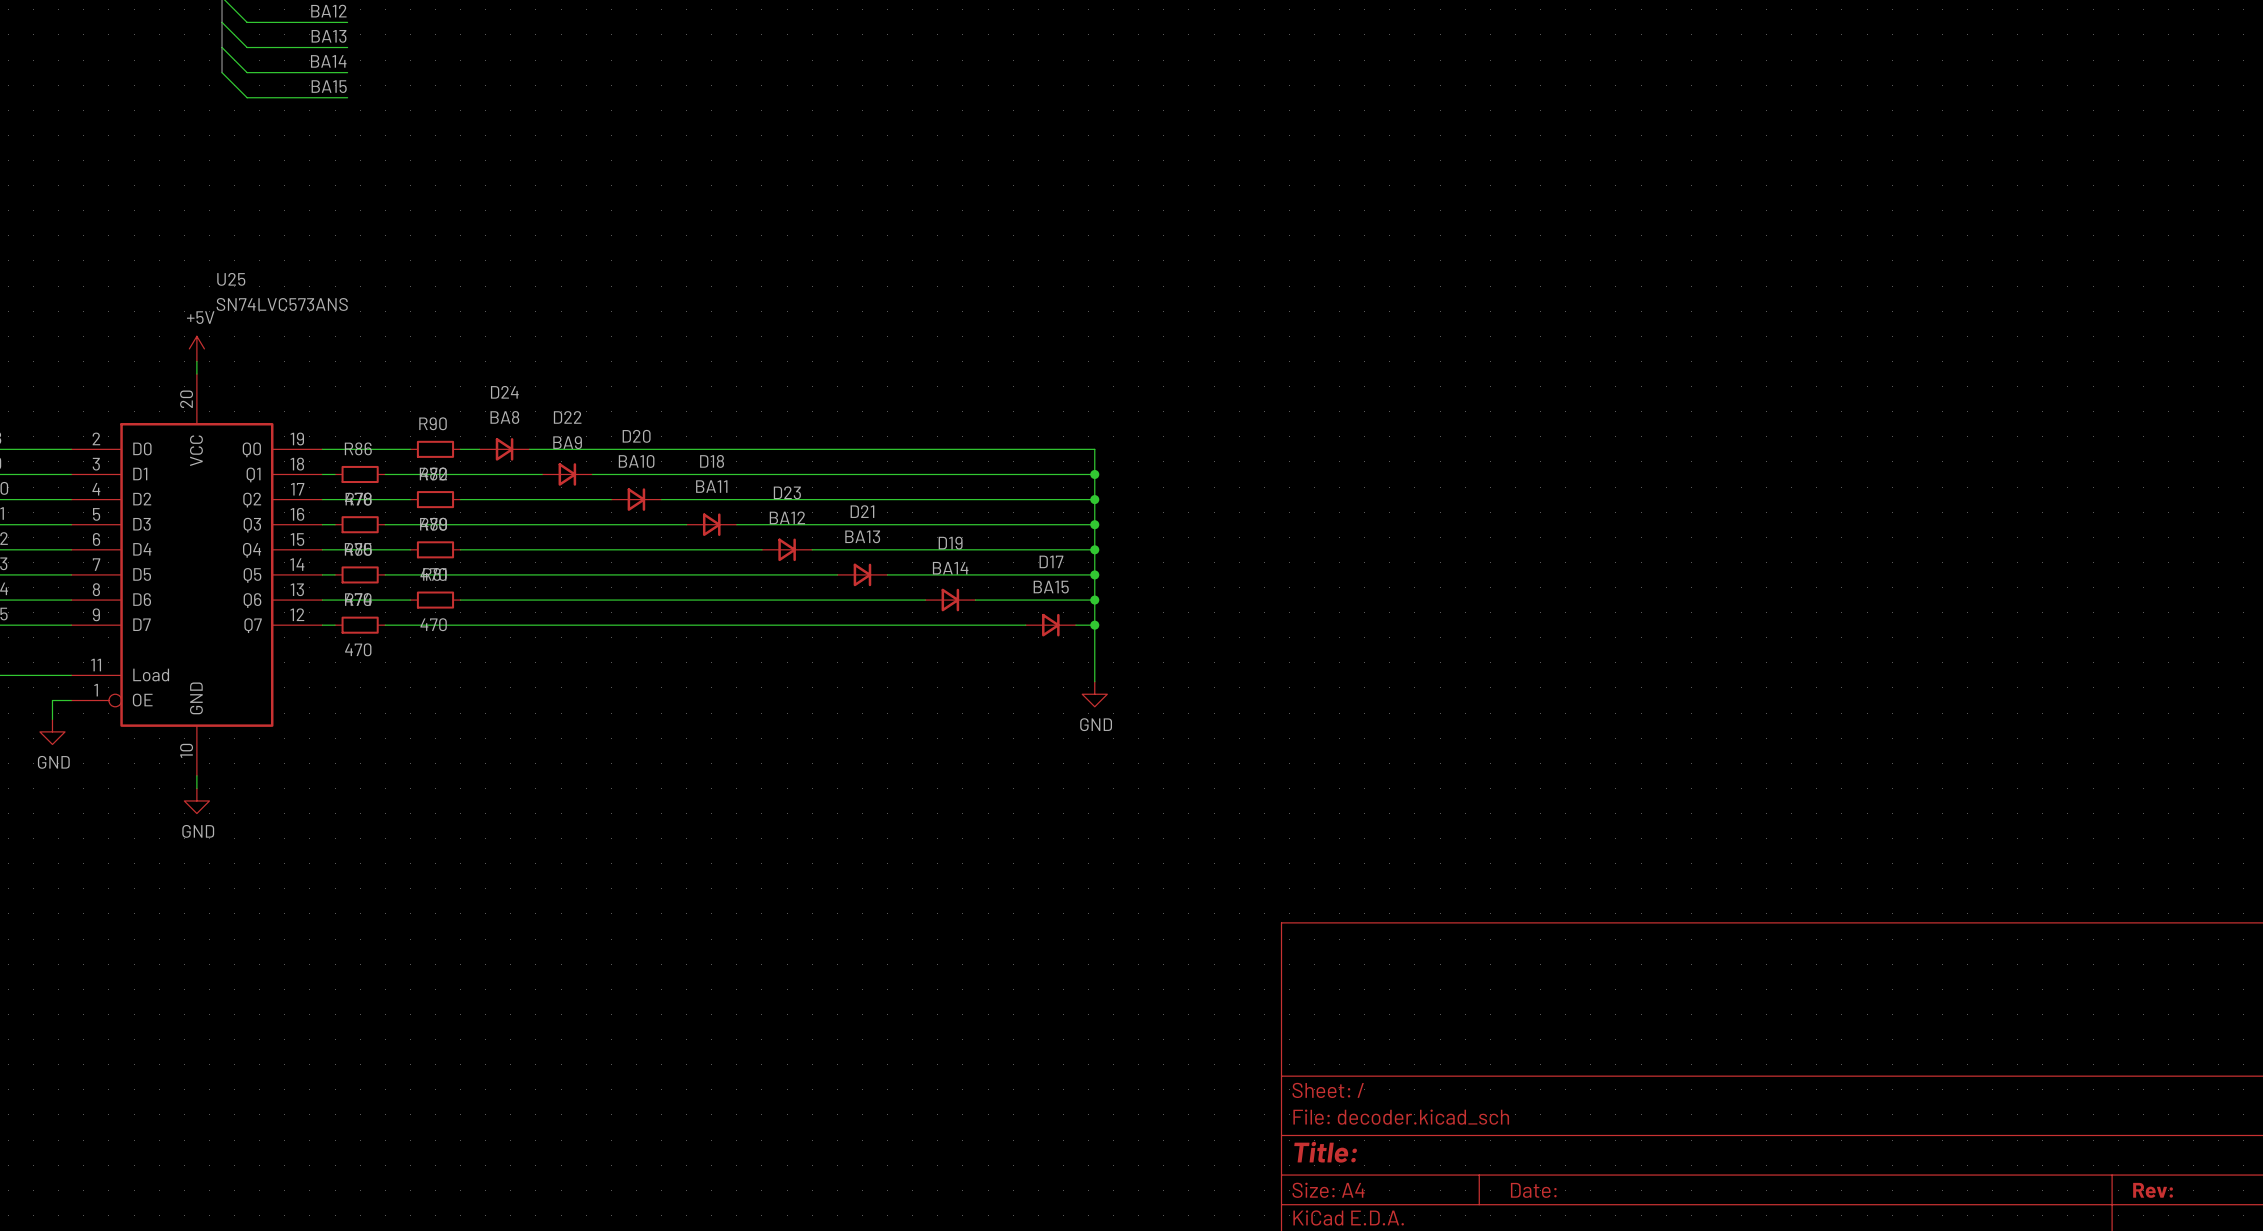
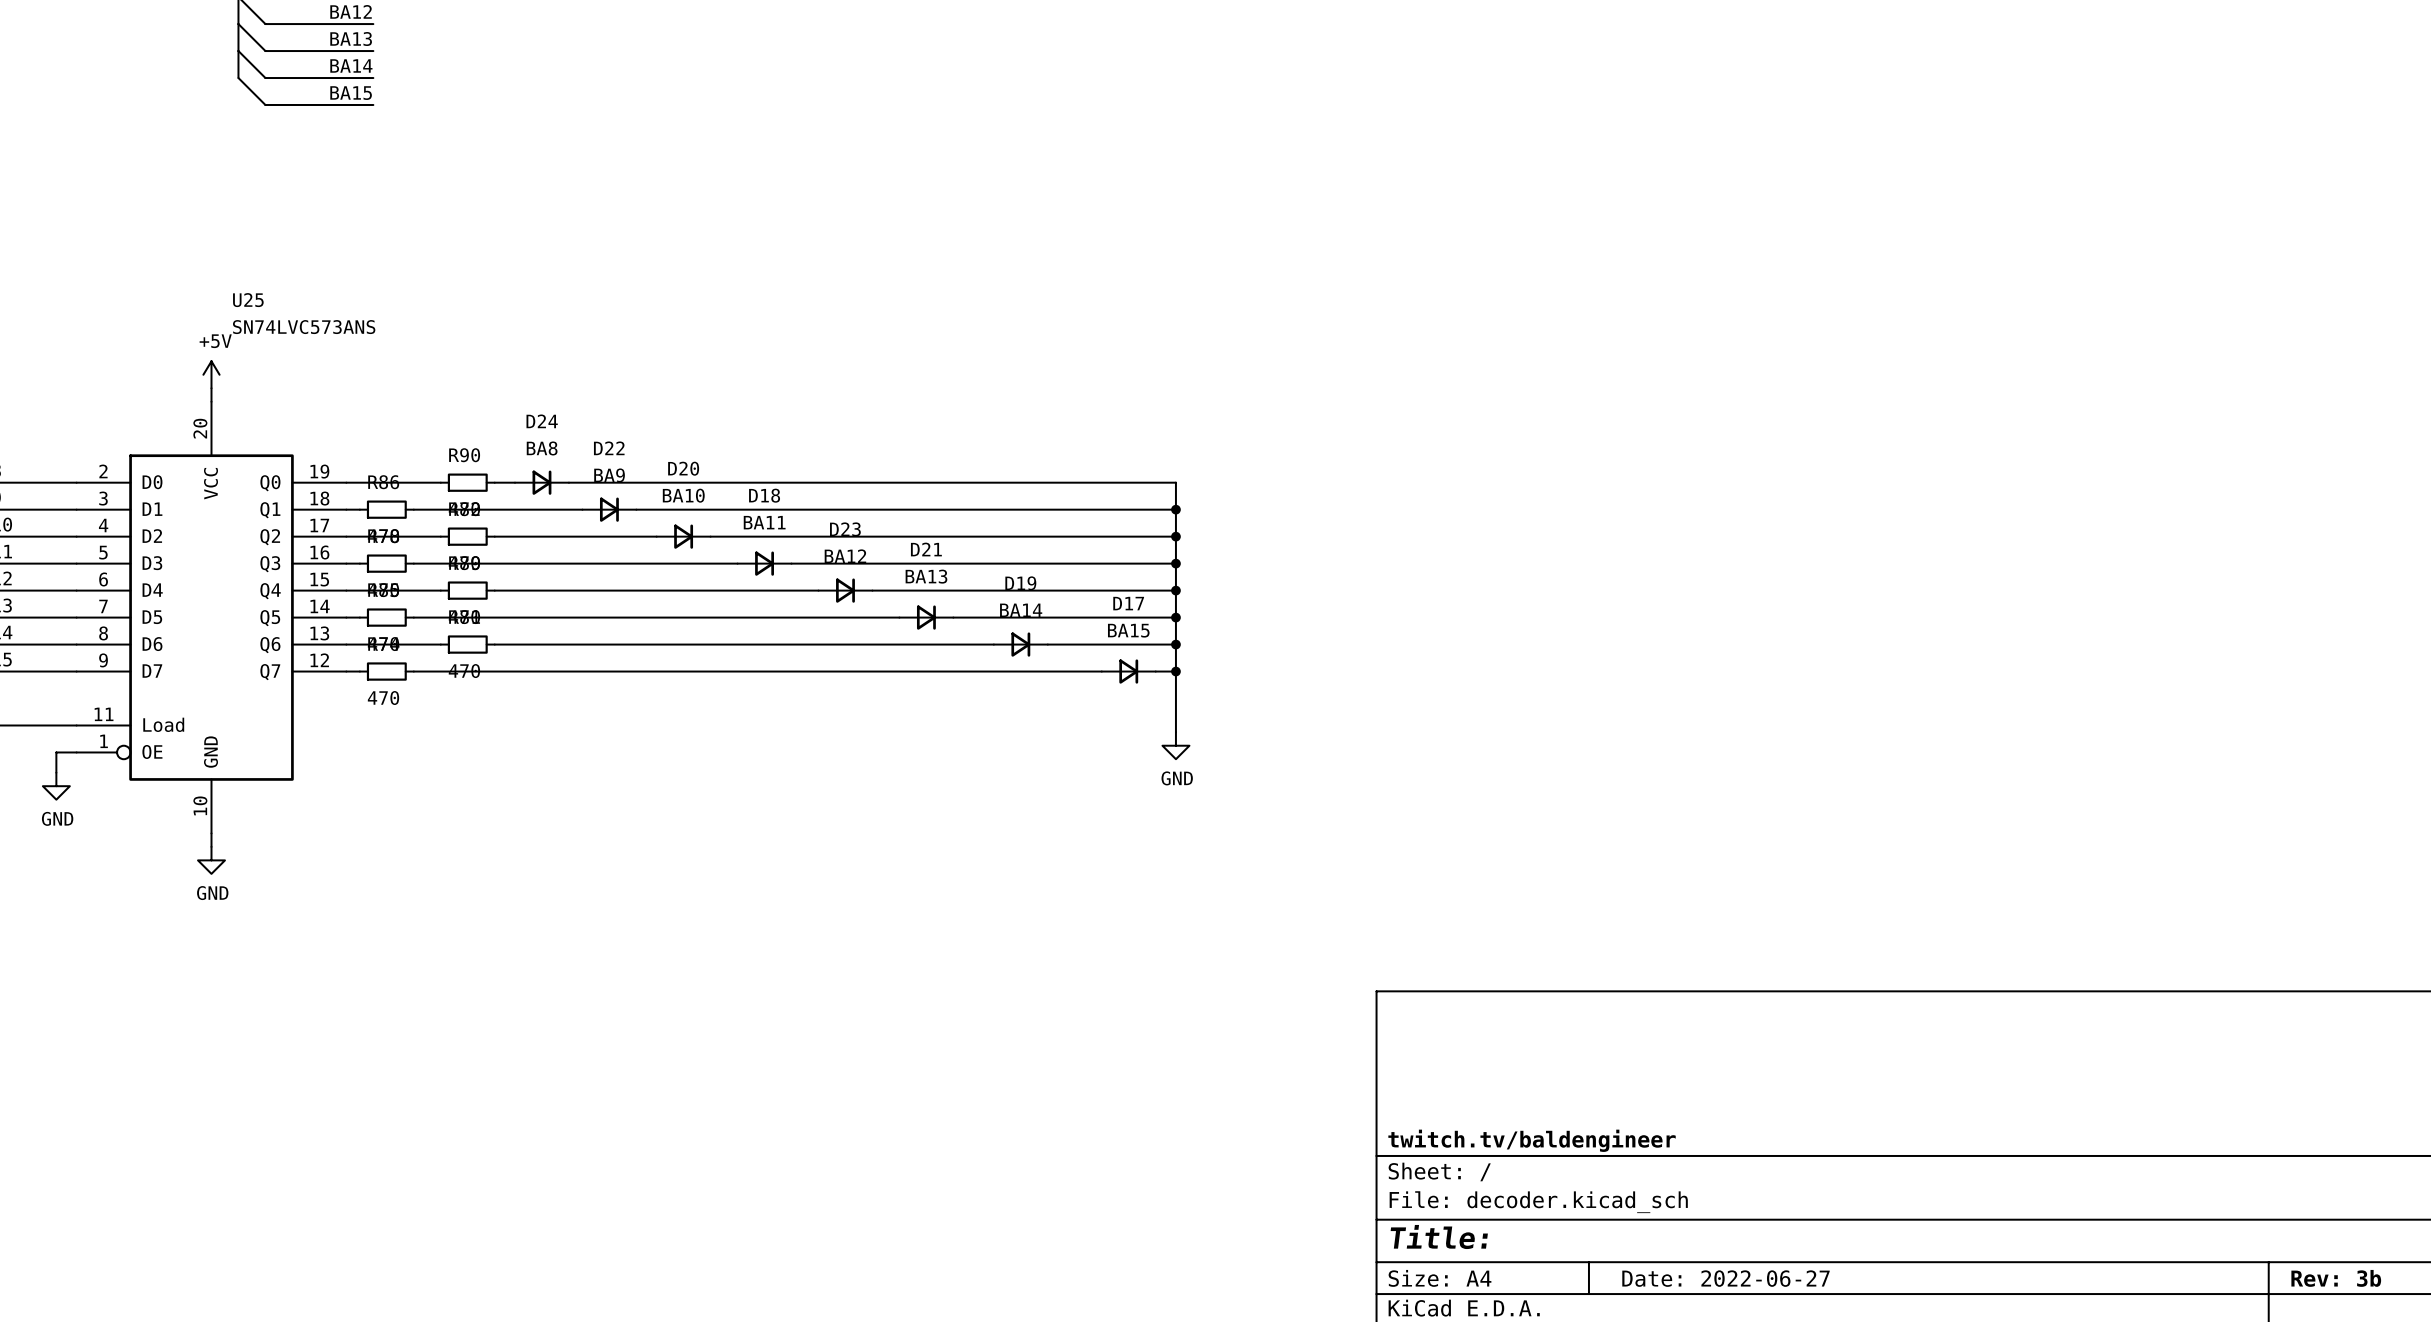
title block: none -> twitch.tv/baldengineer (1532, 1140)
title block: Date: (1533, 1190) -> Date: 2022-06-27 (1725, 1278)
title block: Rev: (2153, 1190) -> Rev: 3b (2336, 1278)

